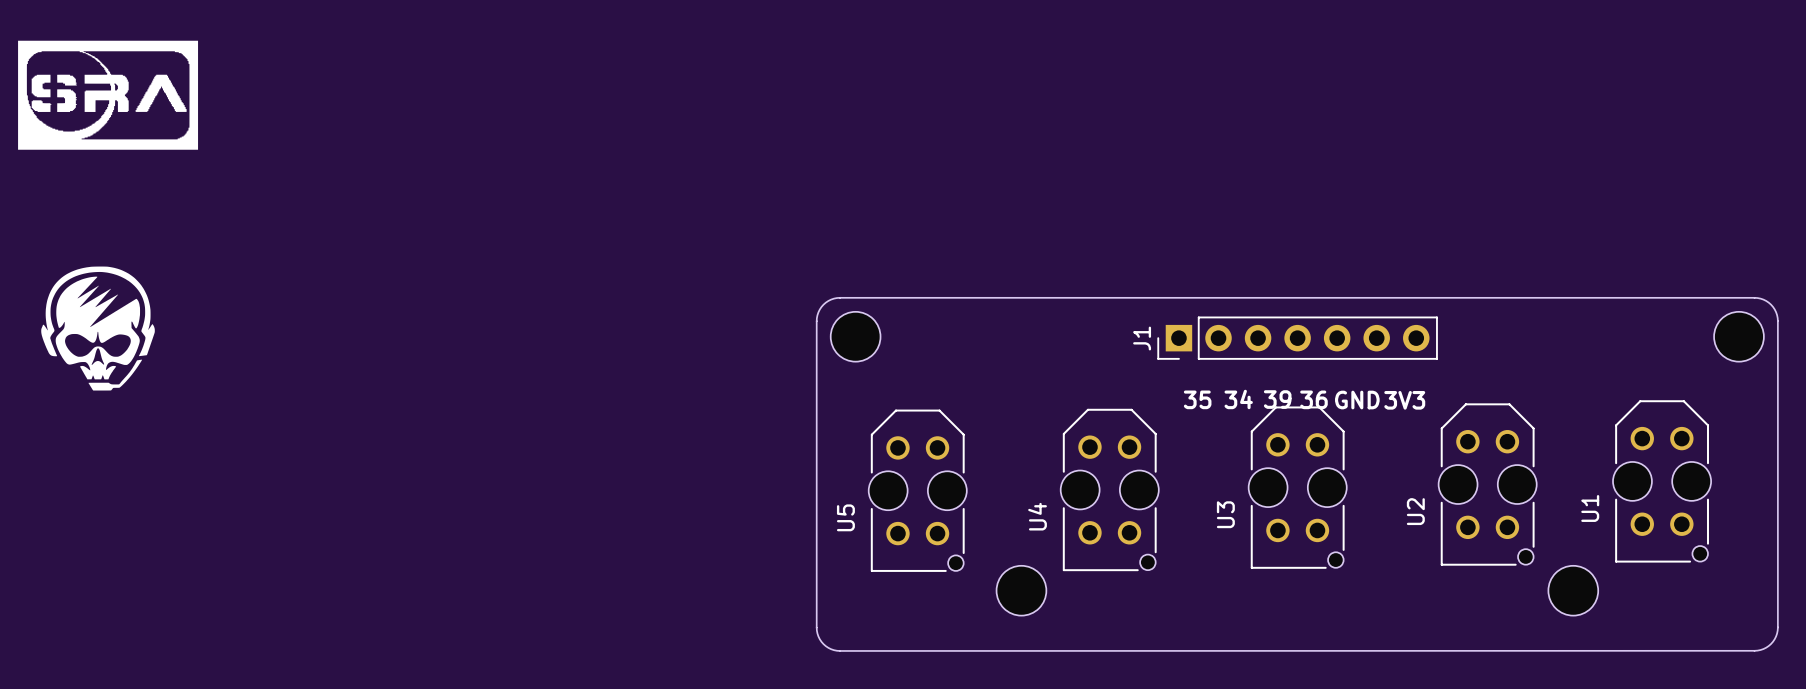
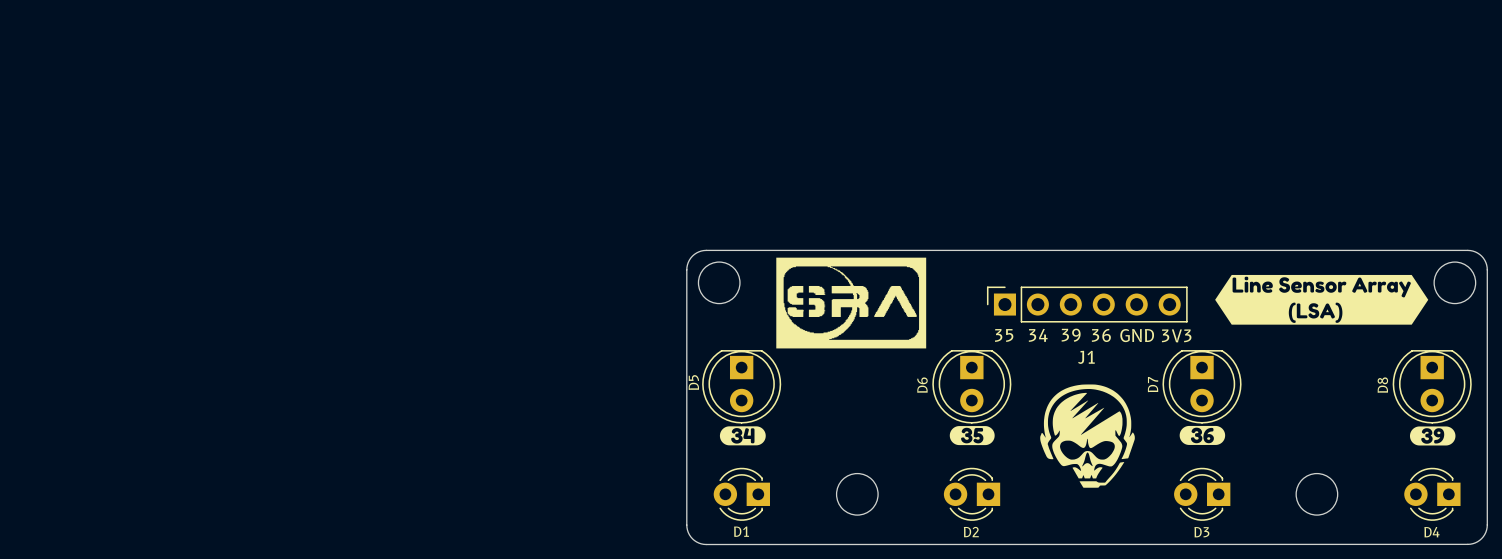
drawing: [18, 40, 199, 150] -> none
drawing: [41, 266, 155, 391] -> none
drawing: none -> [776, 257, 927, 349]
J1 footprint: [1157, 316, 1438, 360] -> [986, 286, 1188, 323]
drawing: none -> [1215, 274, 1429, 325]
J1 name position: J1 (1142, 338) -> J1 (1086, 357)
drawing: none -> [1040, 384, 1135, 488]
D5: none -> (741, 386)
D6: none -> (971, 386)
D7: none -> (1202, 386)
D8: none -> (1432, 386)
U1: (1662, 481) -> none
U2: (1487, 484) -> none
U3: (1297, 487) -> none
U4: (1109, 489) -> none
U5: (917, 490) -> none
drawing: none -> [949, 426, 995, 446]
drawing: none -> [1179, 425, 1226, 445]
drawing: none -> [719, 426, 766, 446]
drawing: none -> [1409, 426, 1456, 446]
D1: none -> (741, 494)
D2: none -> (972, 494)
D3: none -> (1202, 494)
D4: none -> (1432, 494)

